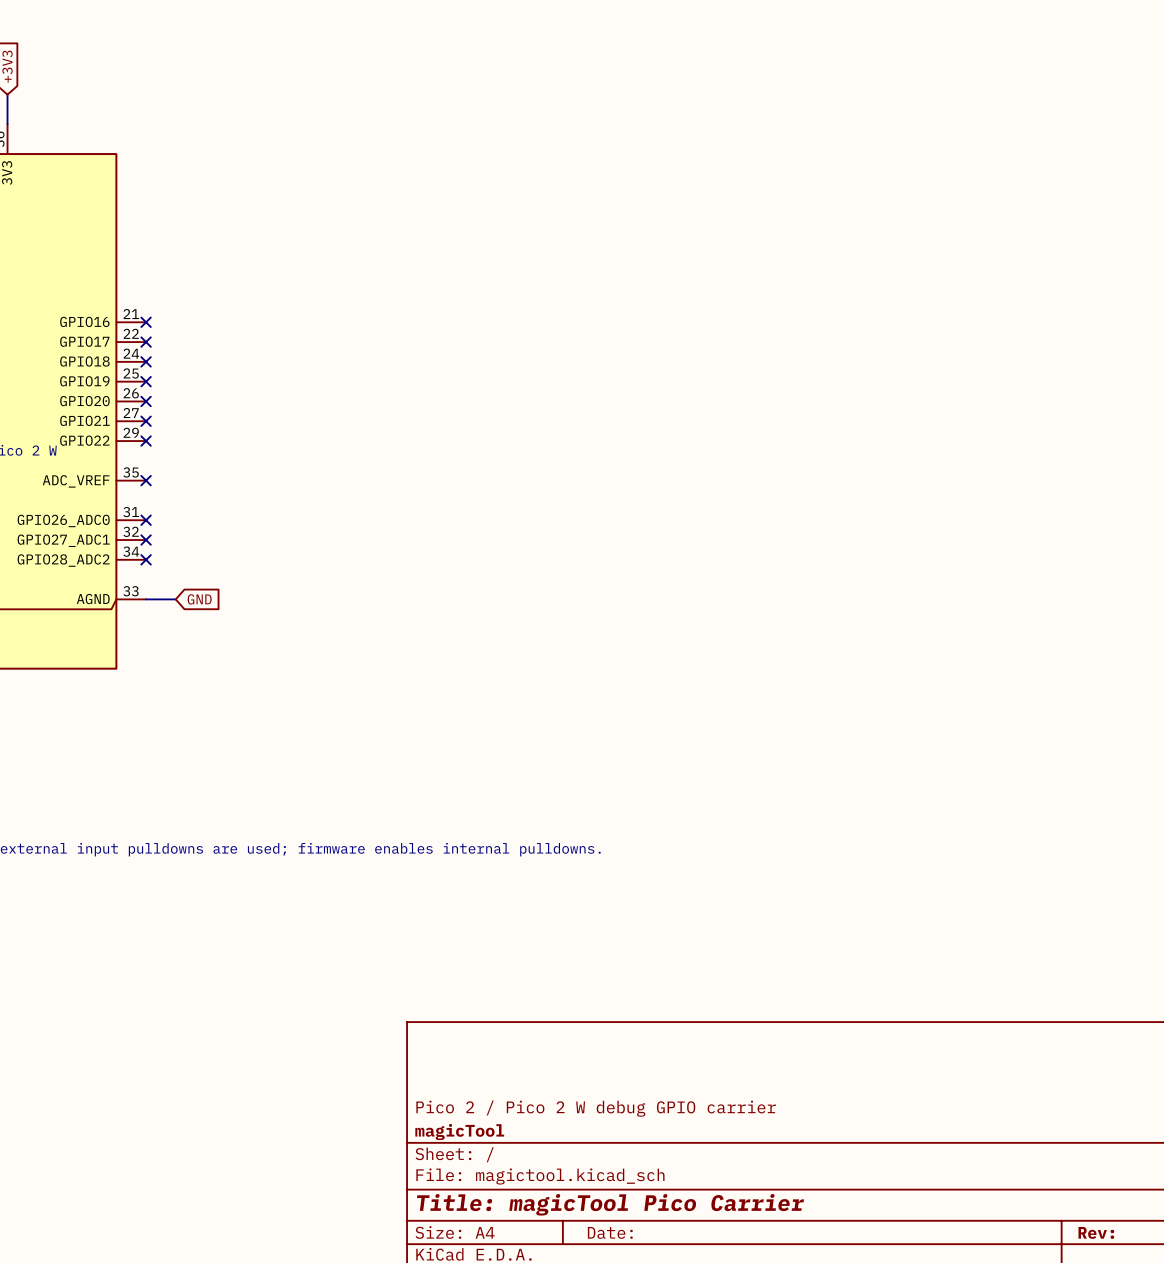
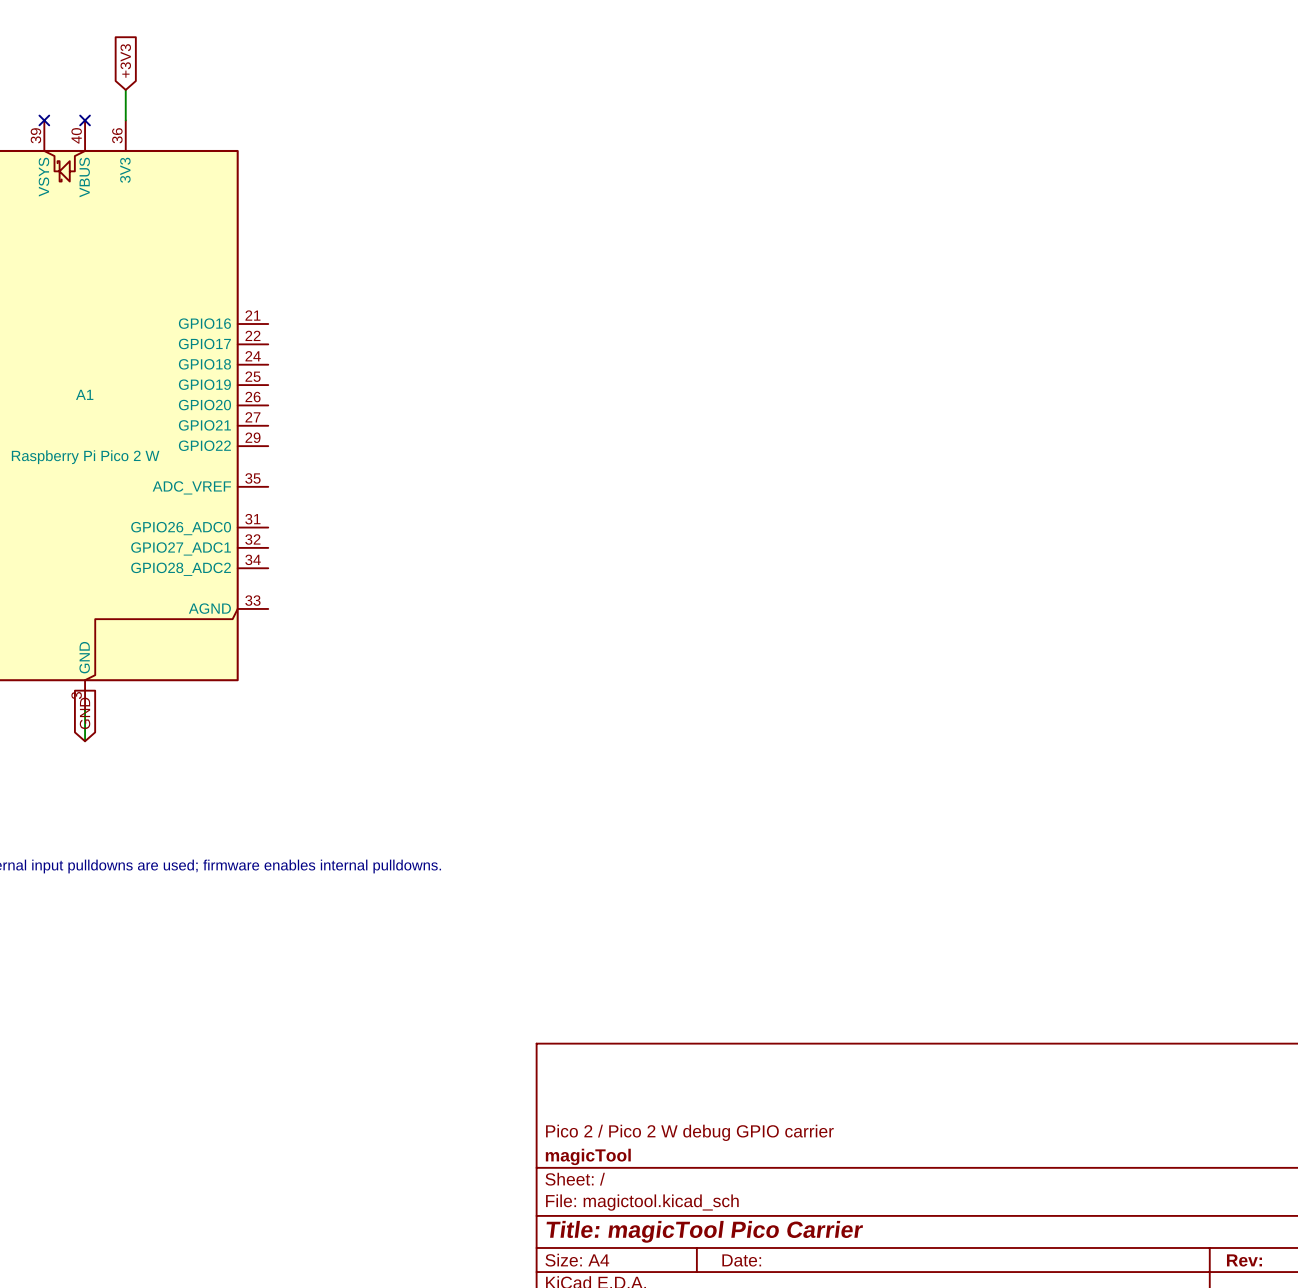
no-connect mark: (146, 322) -> none
no-connect mark: (146, 342) -> none
no-connect mark: (146, 361) -> none
no-connect mark: (146, 381) -> none
no-connect mark: (146, 401) -> none
no-connect mark: (146, 421) -> none
no-connect mark: (146, 441) -> none
no-connect mark: (146, 480) -> none
no-connect mark: (146, 520) -> none
no-connect mark: (146, 540) -> none
no-connect mark: (146, 559) -> none
wire: (146, 599) (175, 599) -> none
global label: GND (199, 599) -> none

